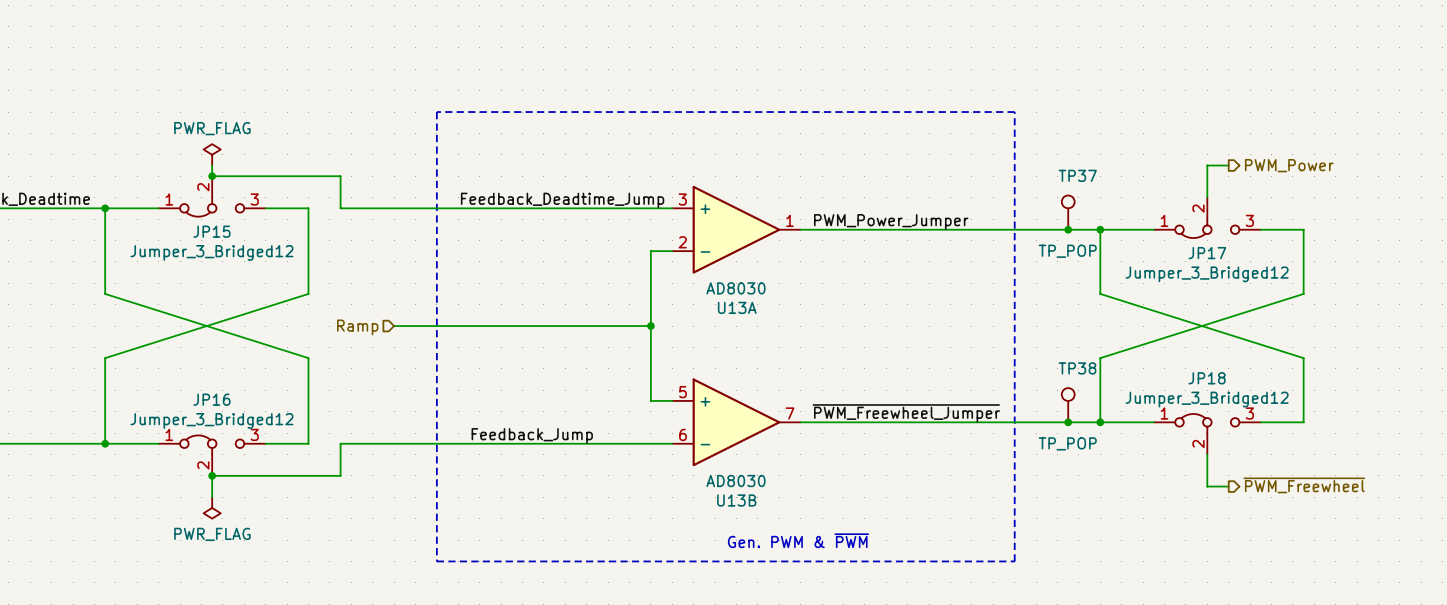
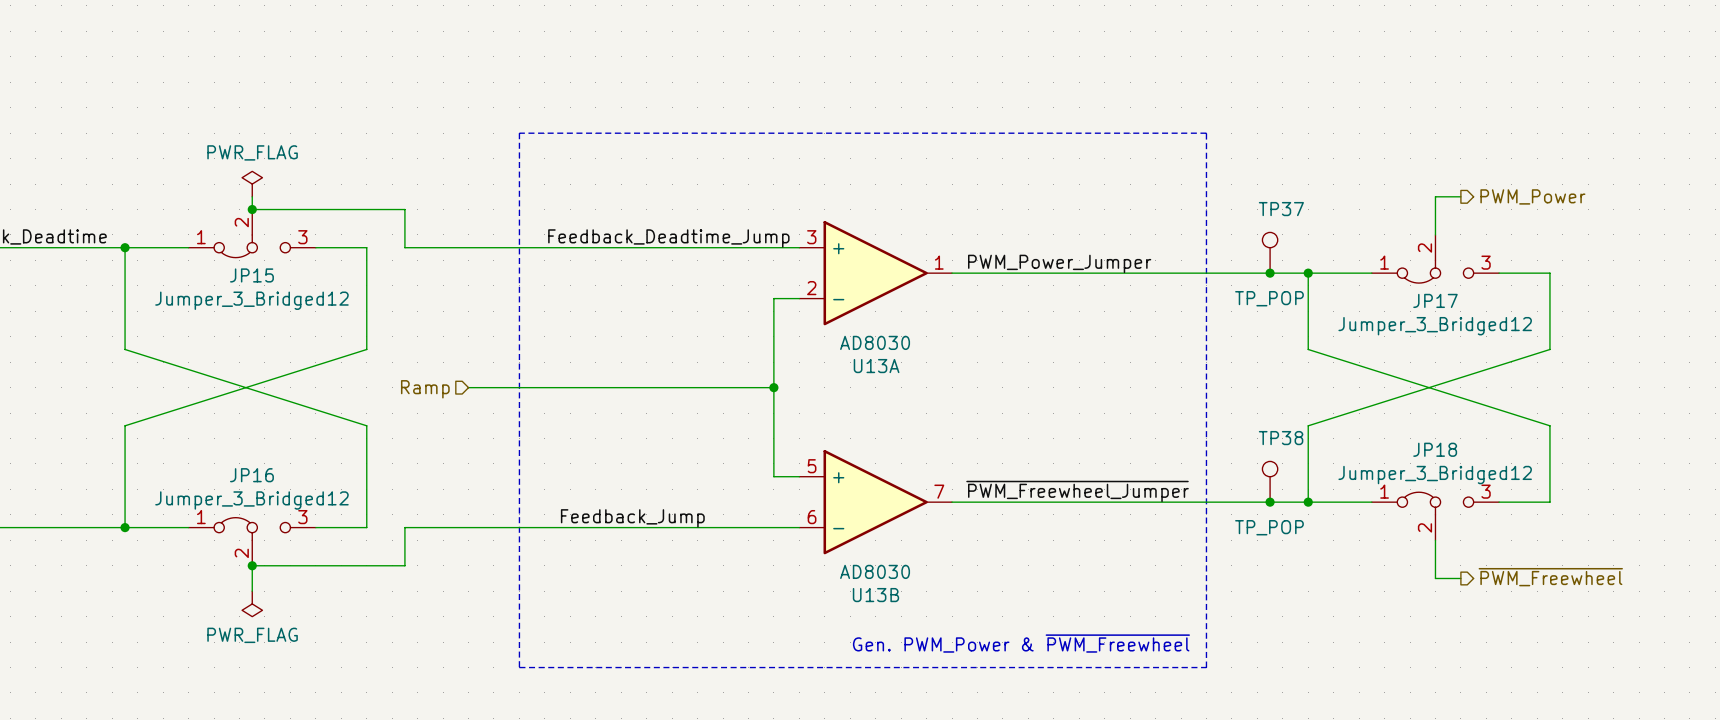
text: Gen. PWM & ~{PWM} (798, 540) -> Gen. PWM_Power & ~{PWM_Freewheel} (1021, 643)

